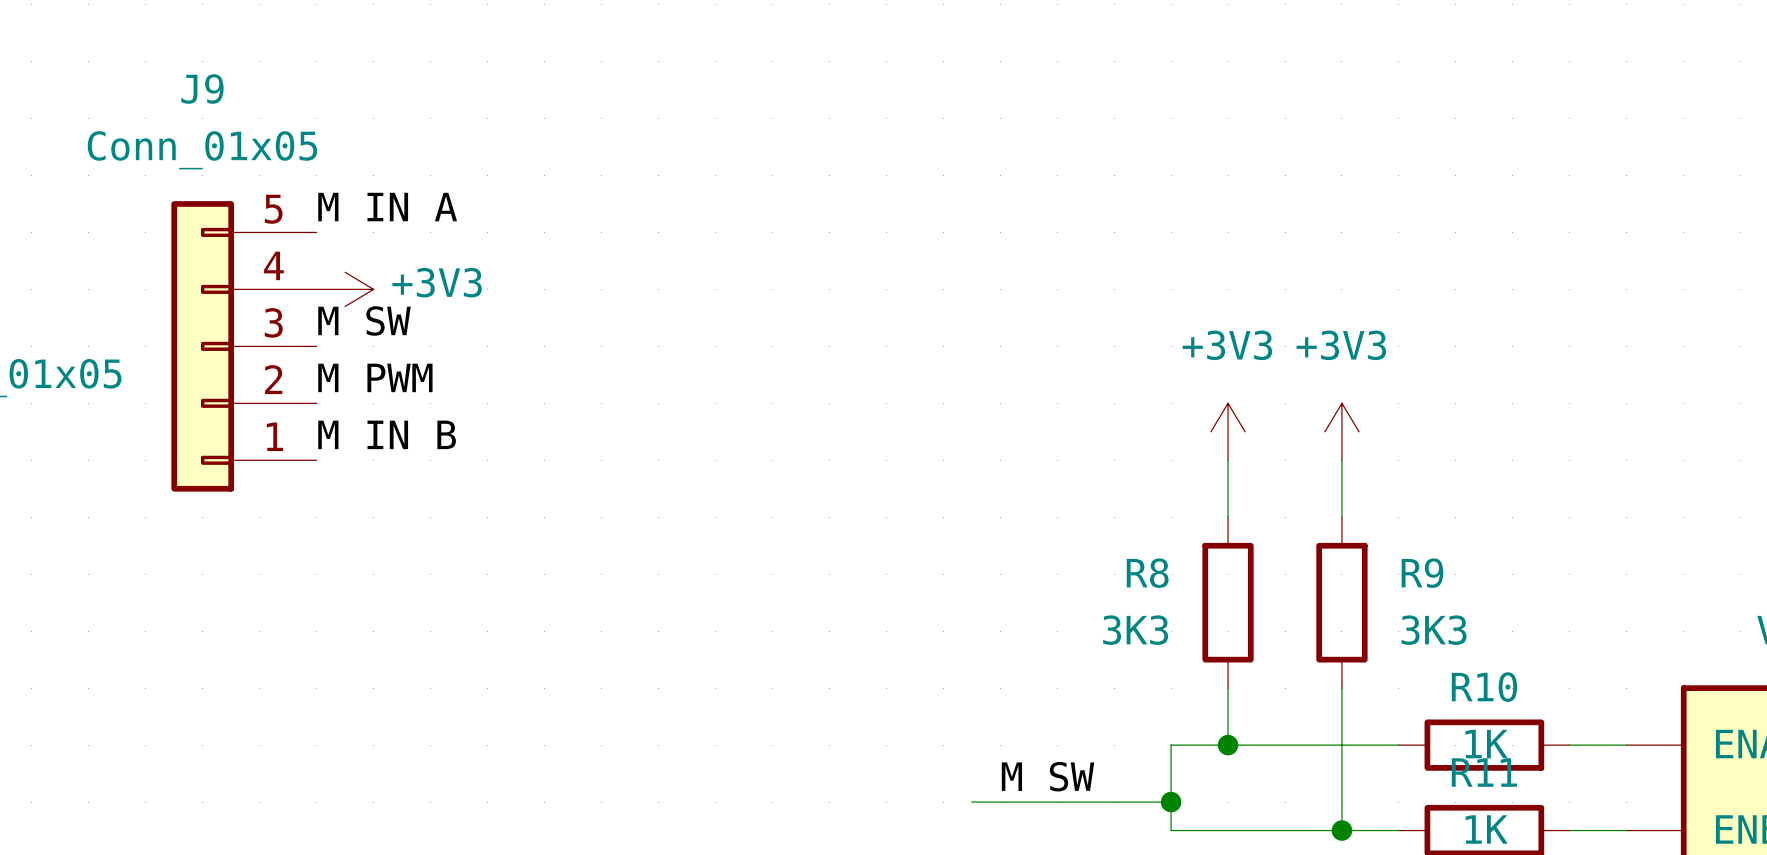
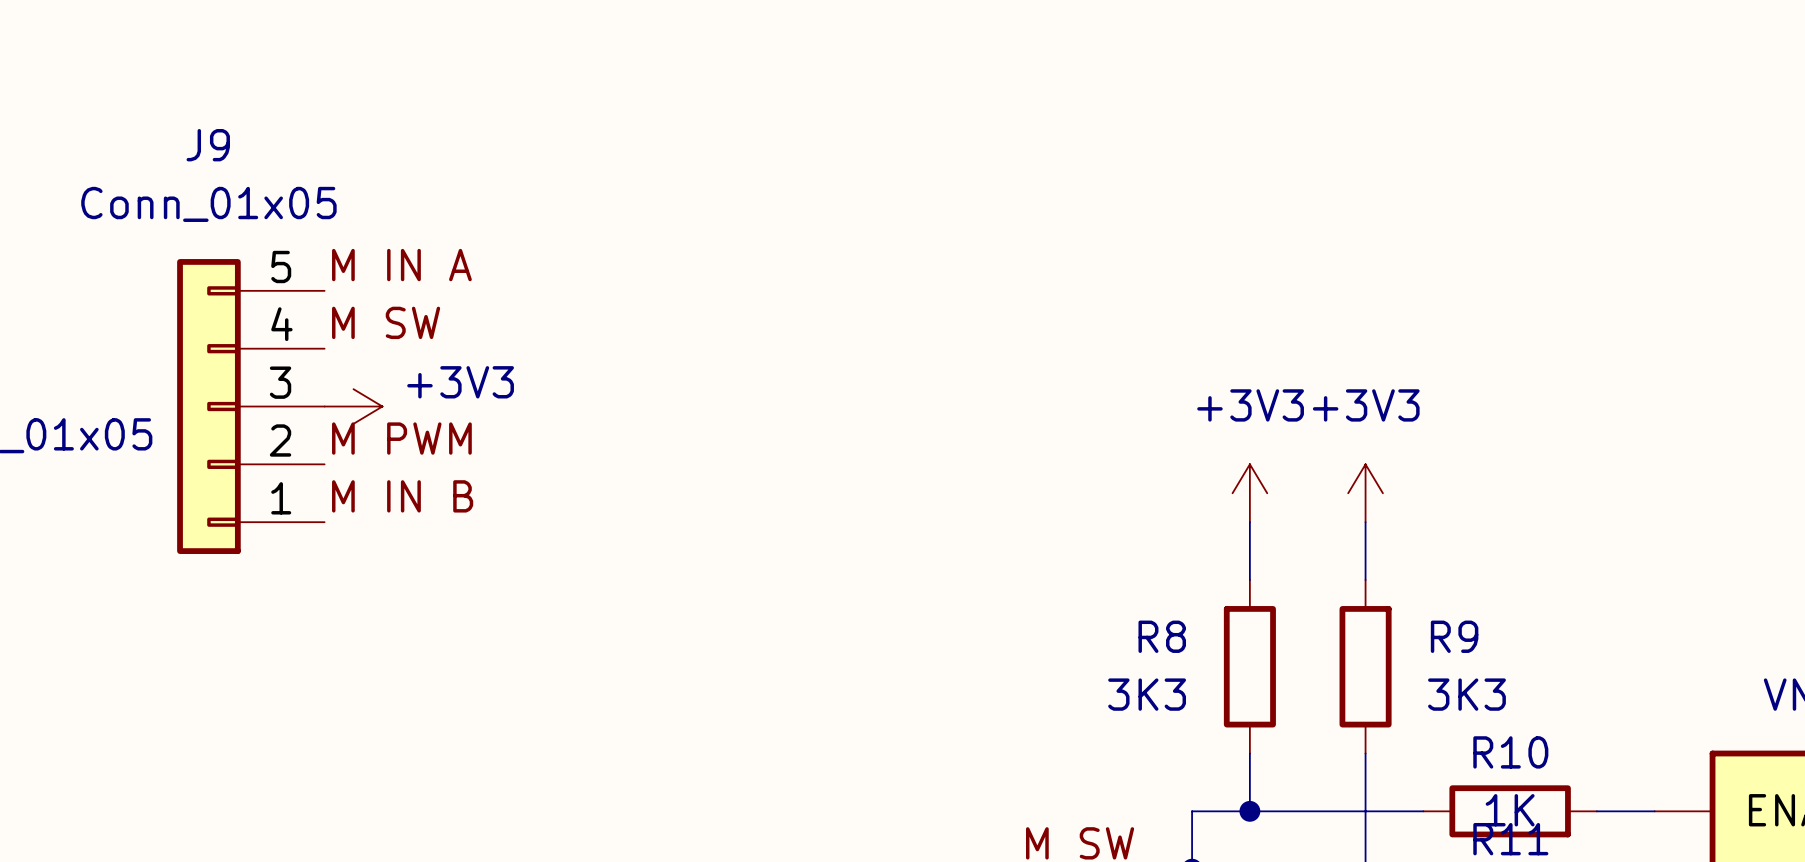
power symbol text position: +3V3 (437, 282) -> +3V3 (460, 382)
power symbol position: +3V3 (345, 289) -> +3V3 (353, 406)
label position: M SW (364, 320) -> M SW (386, 322)

